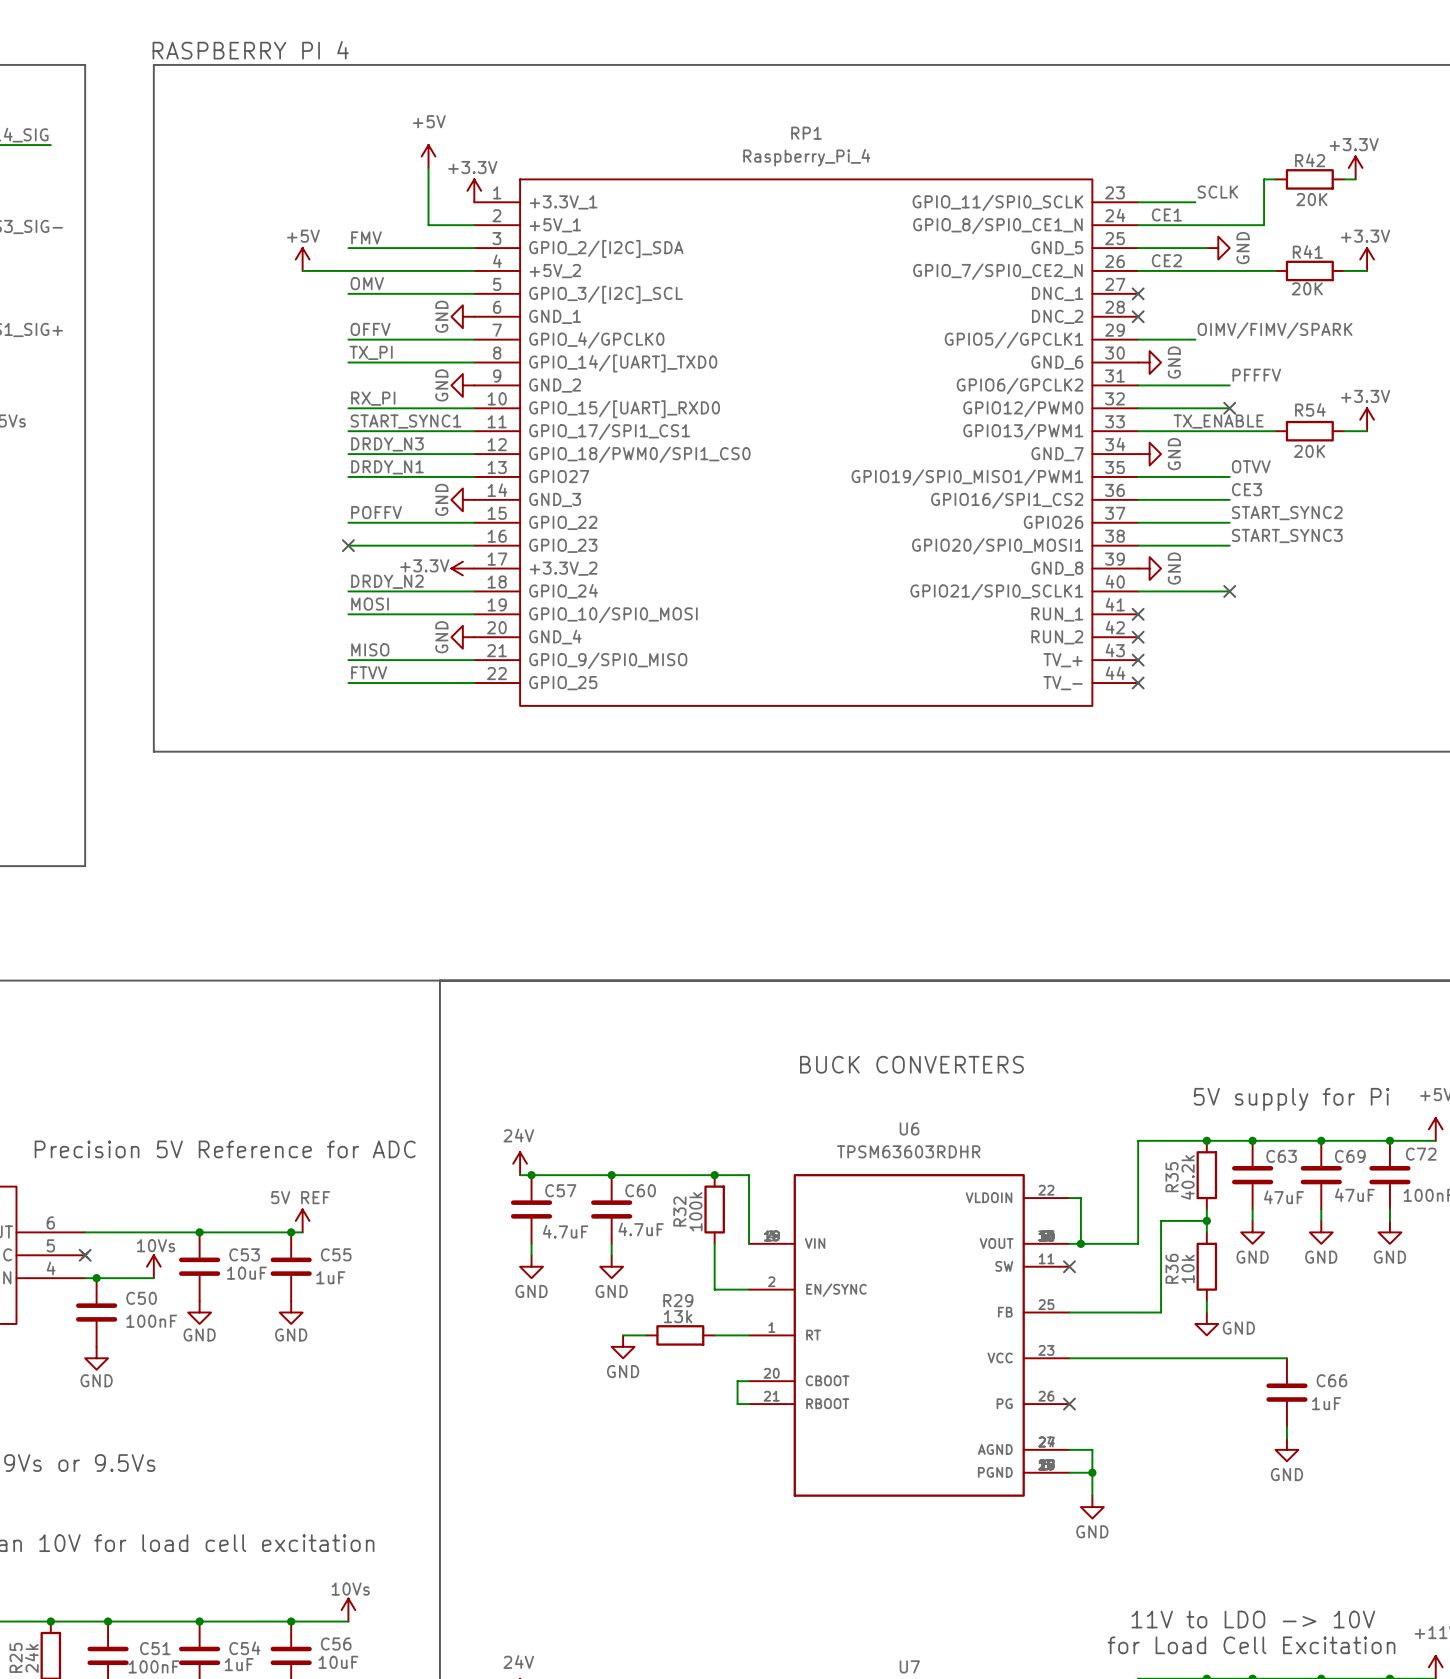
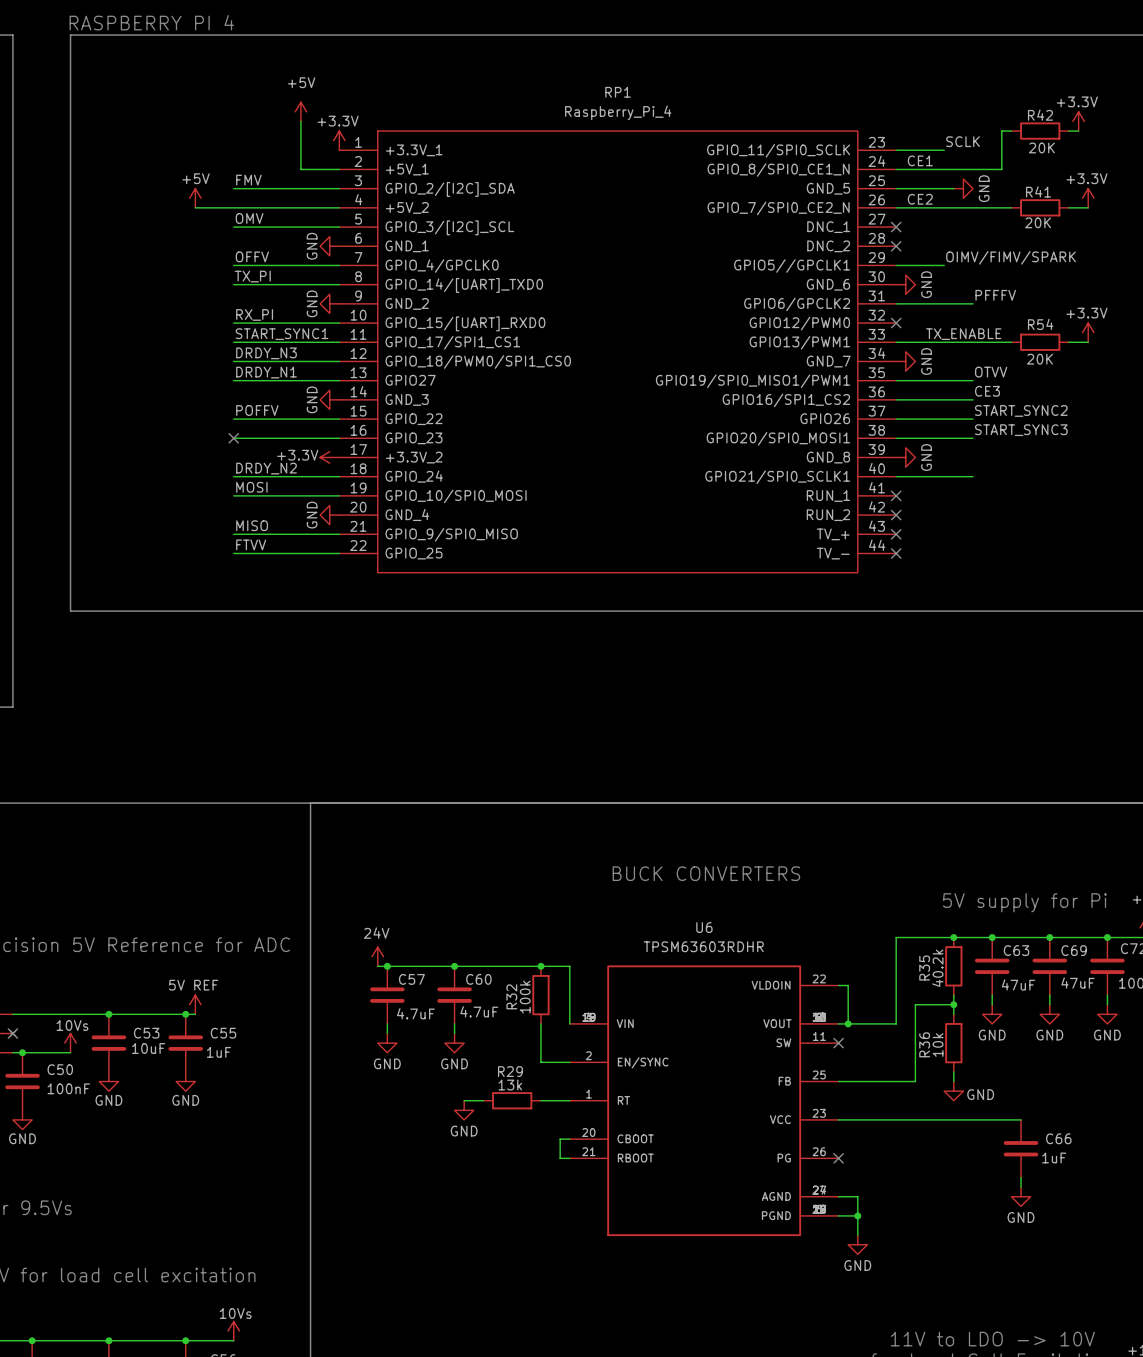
wire: (1138, 408) (1229, 408) -> none
no-connect mark: none -> (896, 323)
no-connect mark: (1229, 408) -> none
no-connect mark: (1229, 591) -> none

